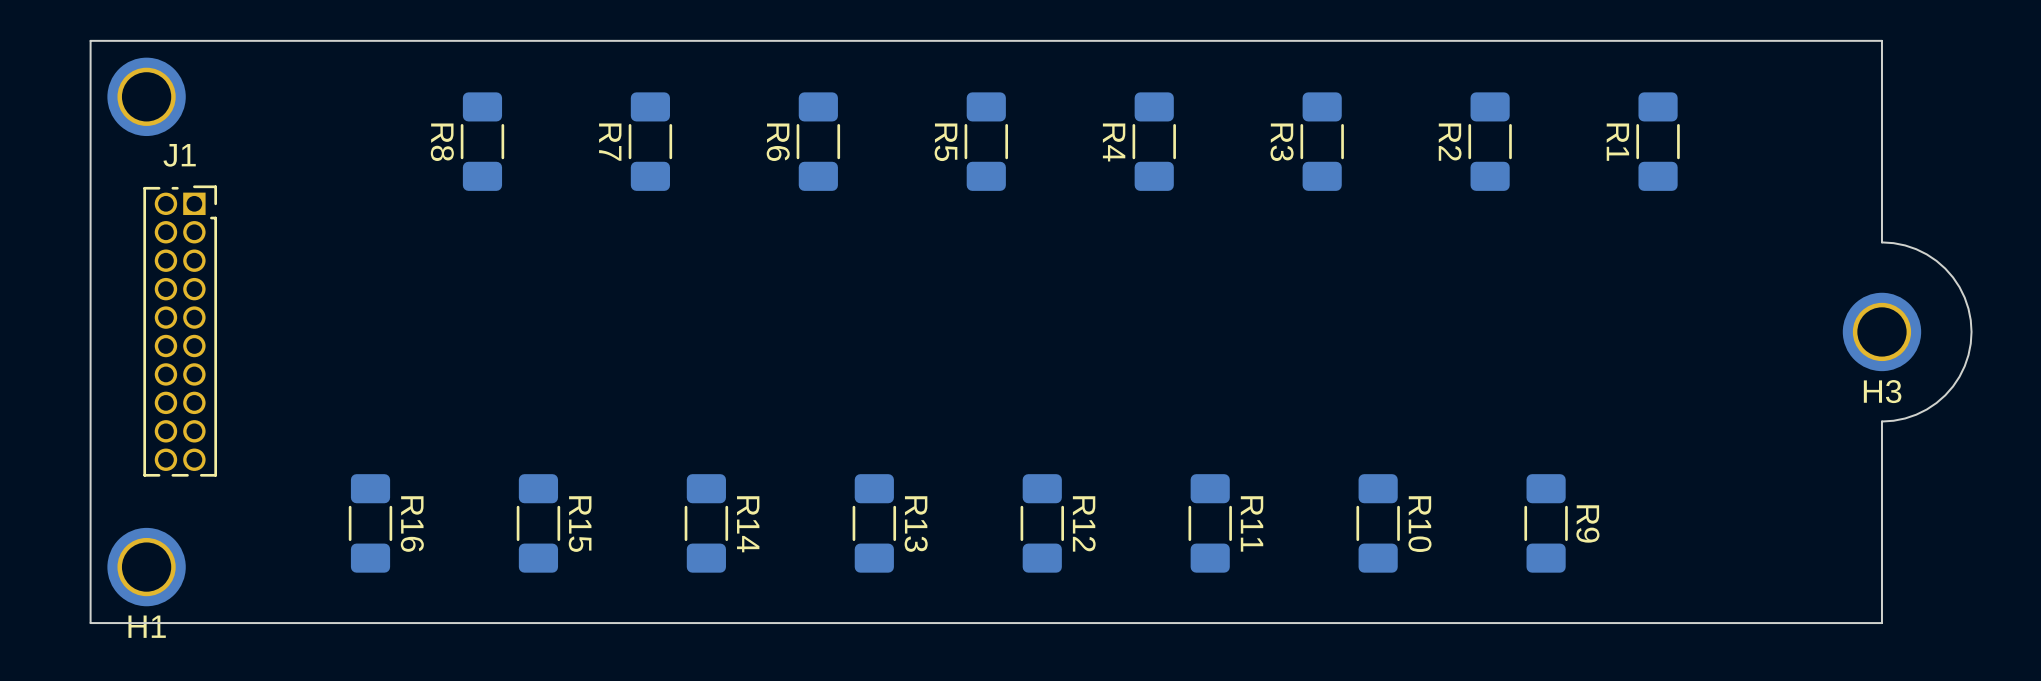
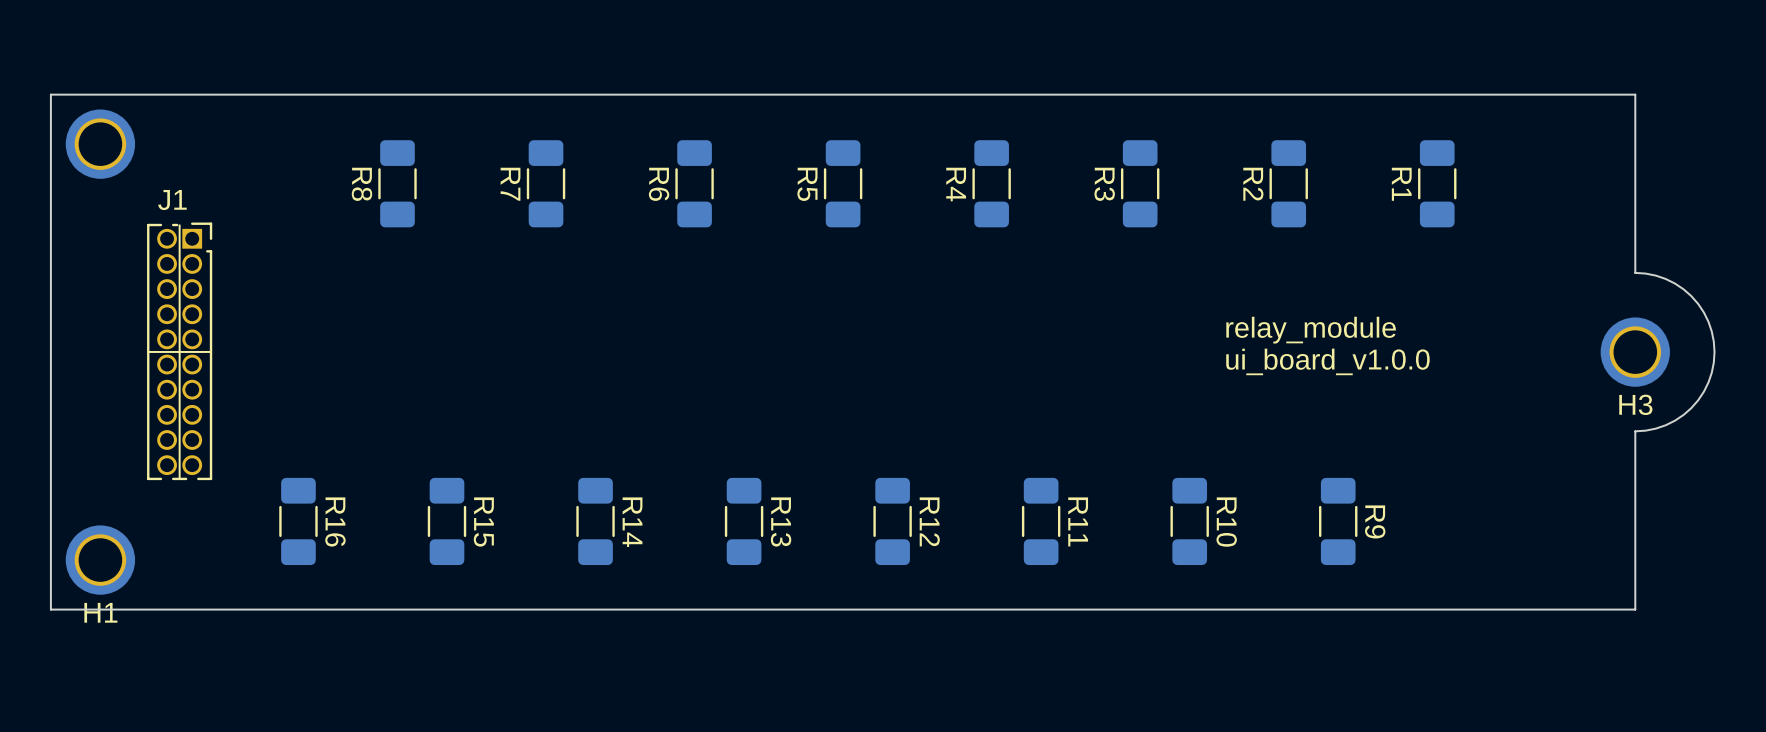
J1 footprint: [143, 185, 218, 477] -> [147, 222, 213, 481]
text: none -> relay_module (1311, 330)
text: none -> ui_board_v1.0.0 (1327, 361)

